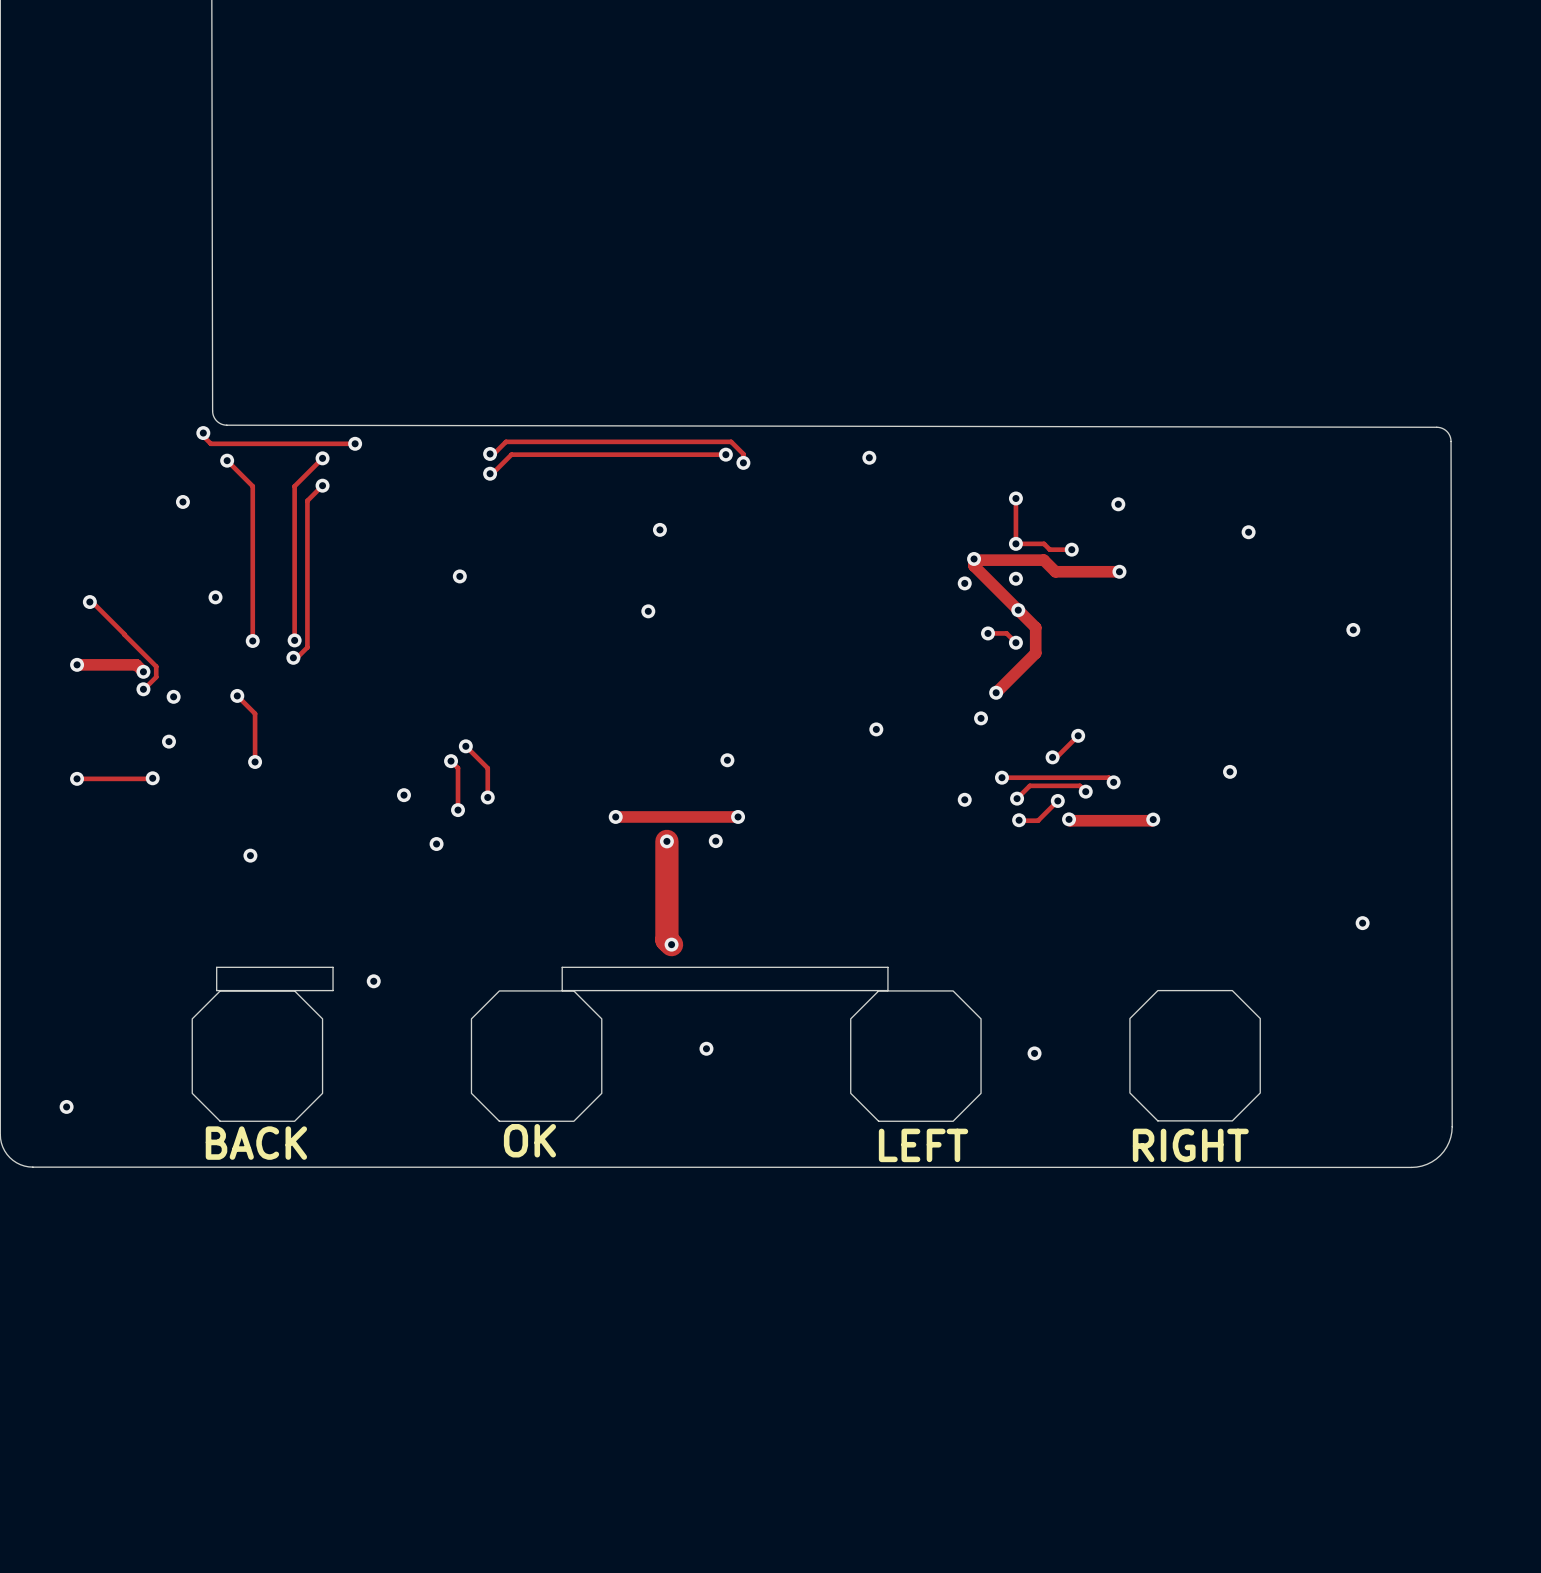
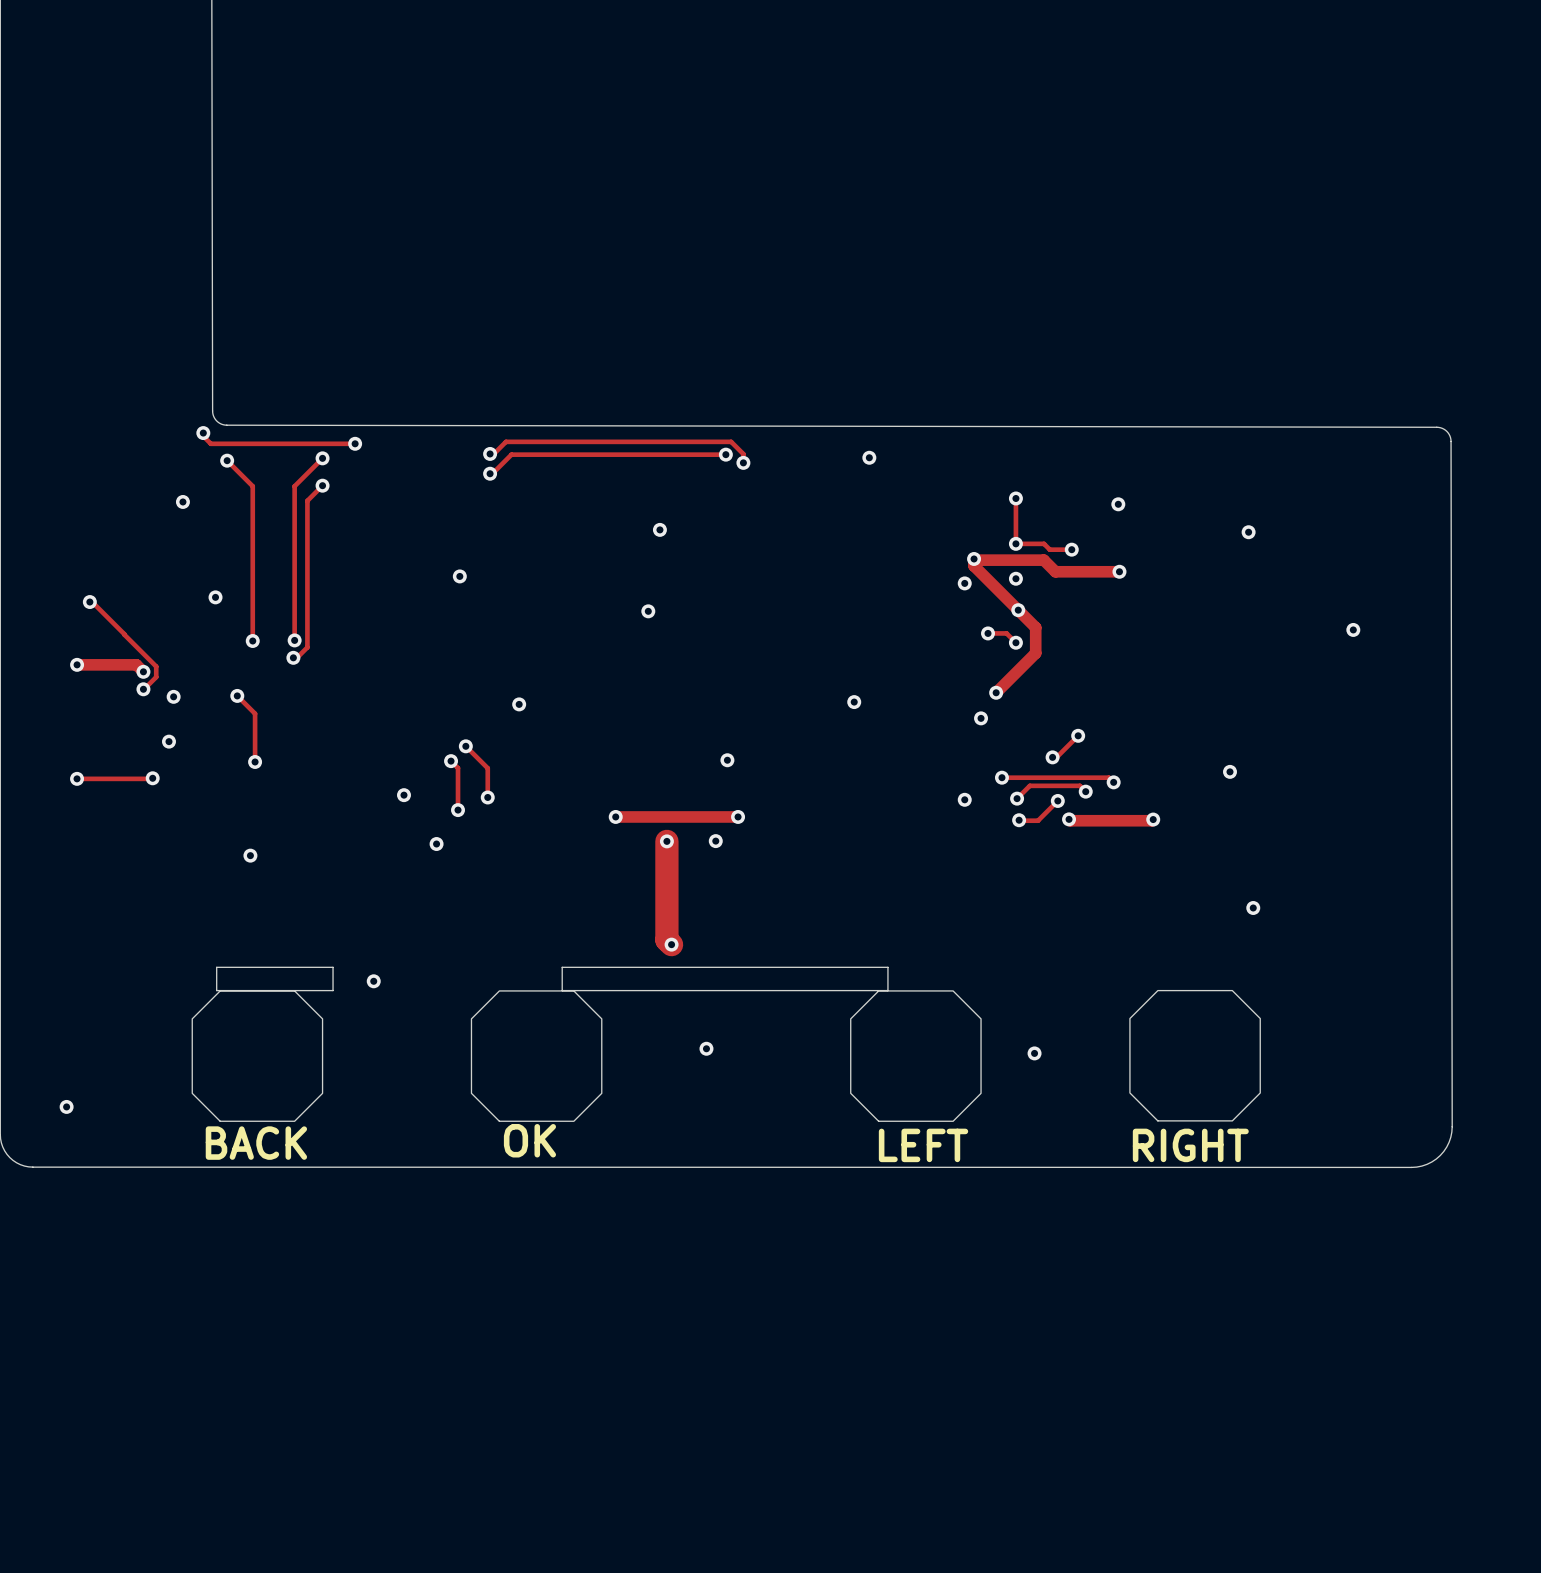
via: none -> (519, 704)
via position: (876, 729) -> (854, 702)
via position: (1362, 923) -> (1253, 907)

